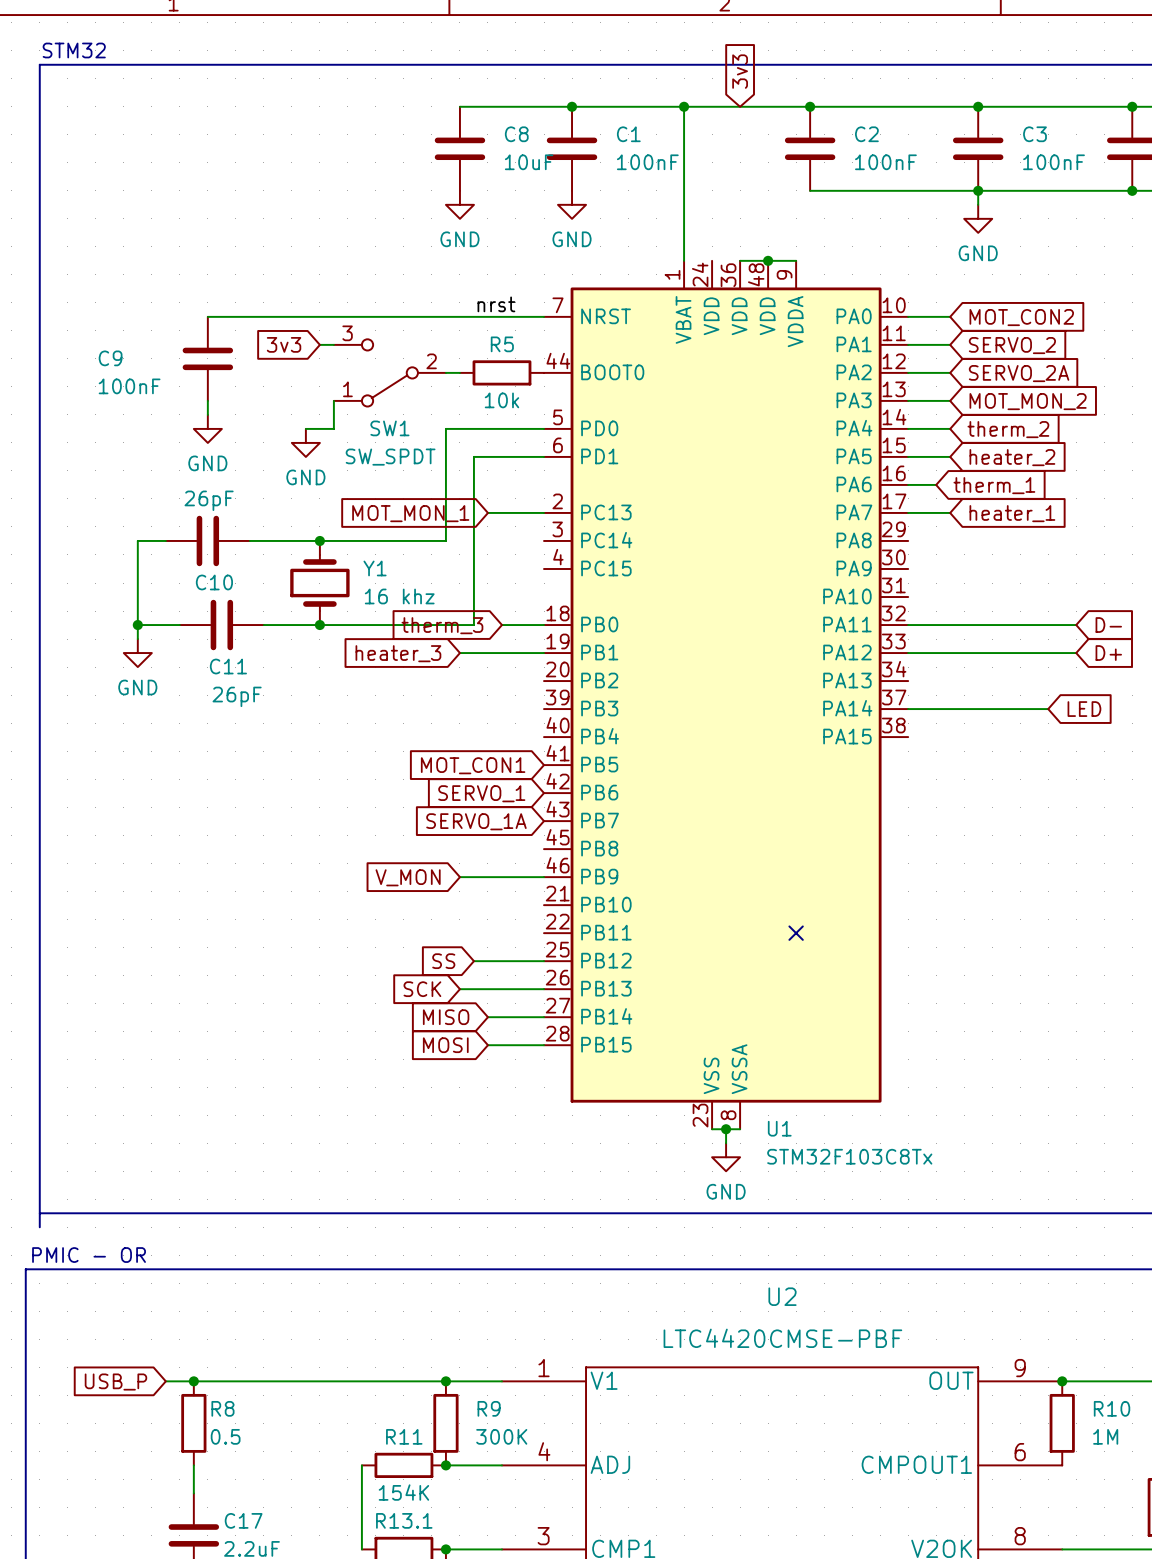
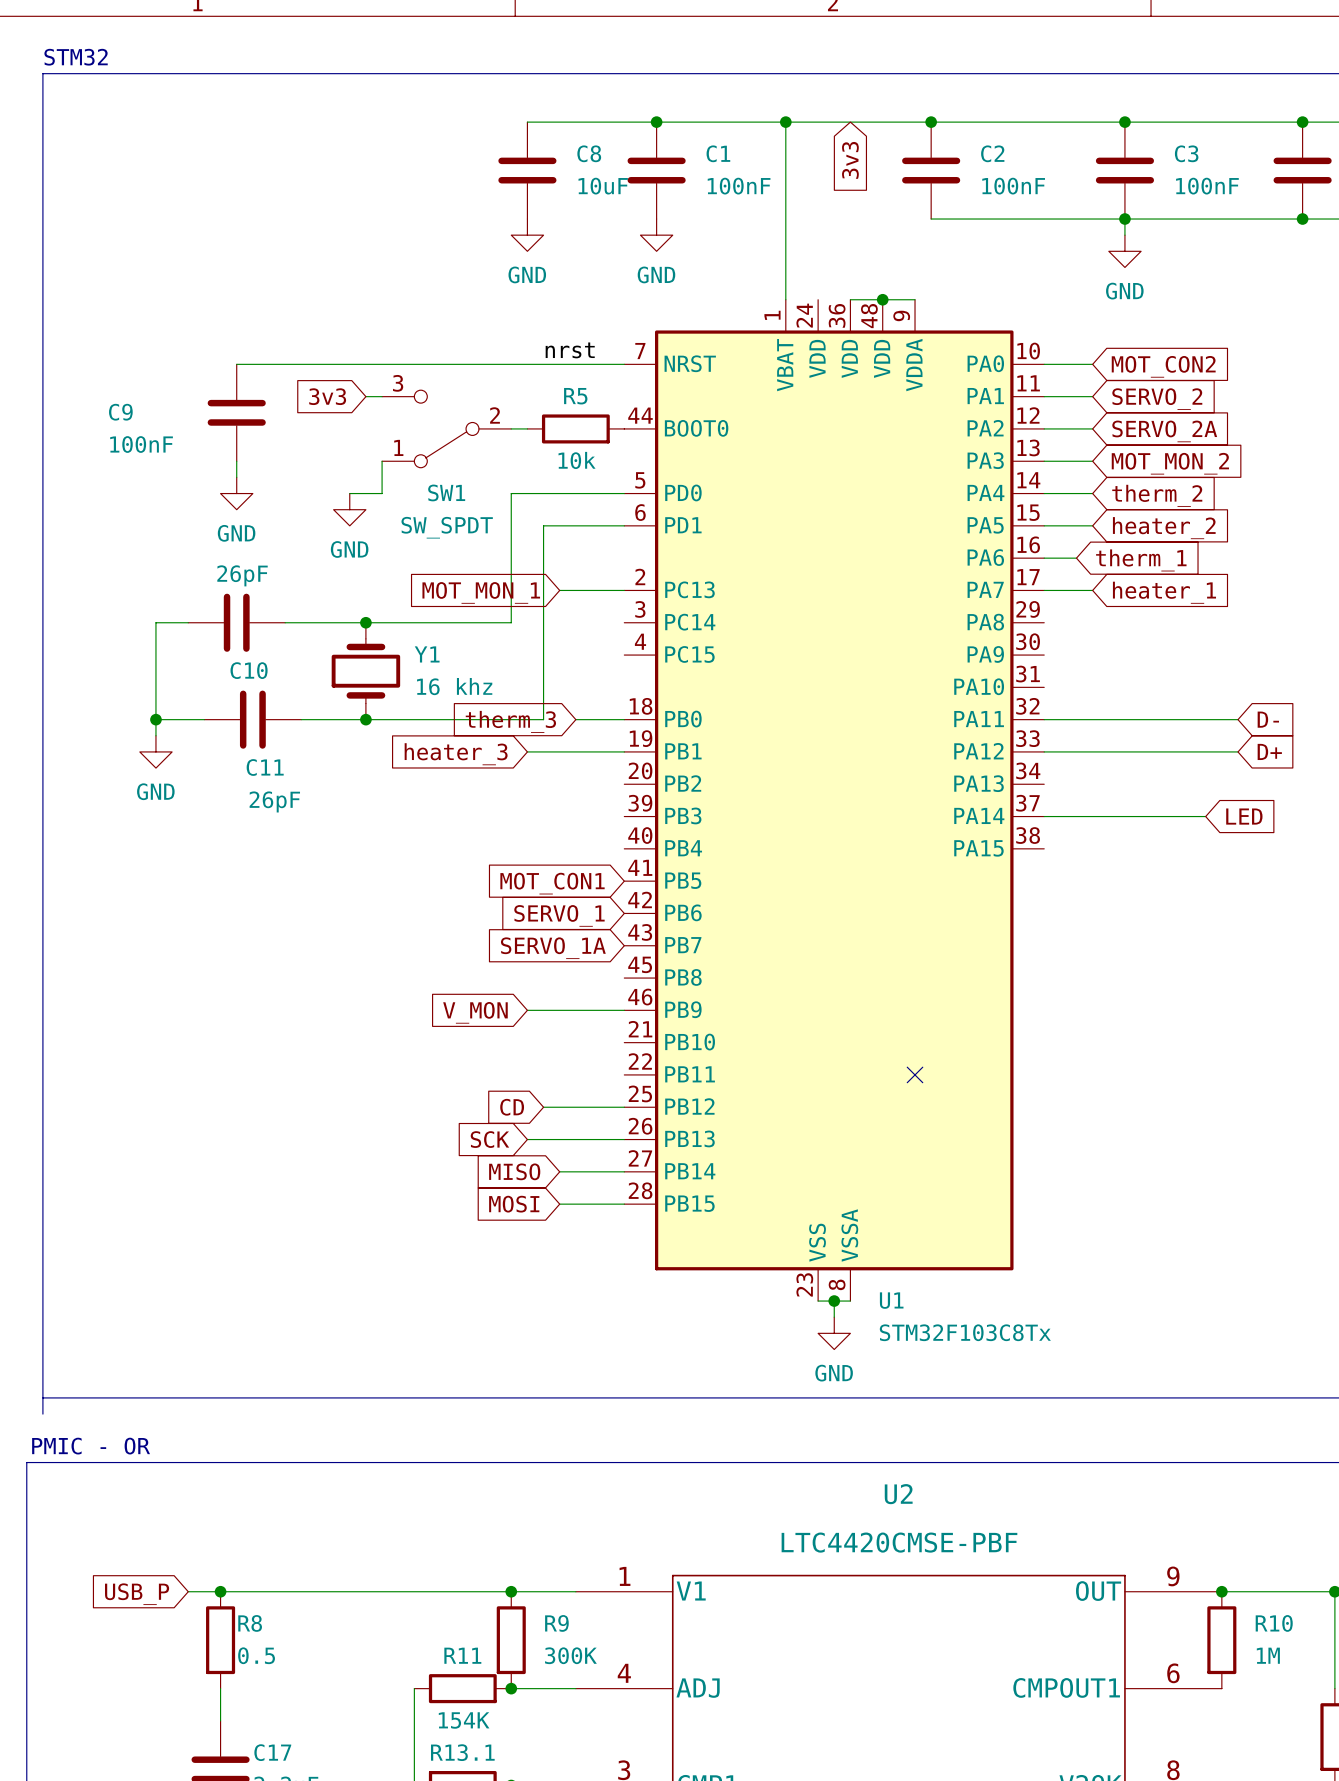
global label rotation: 0° (740, 71) -> 180° (850, 160)
global label: SS (443, 961) -> CD (512, 1107)

